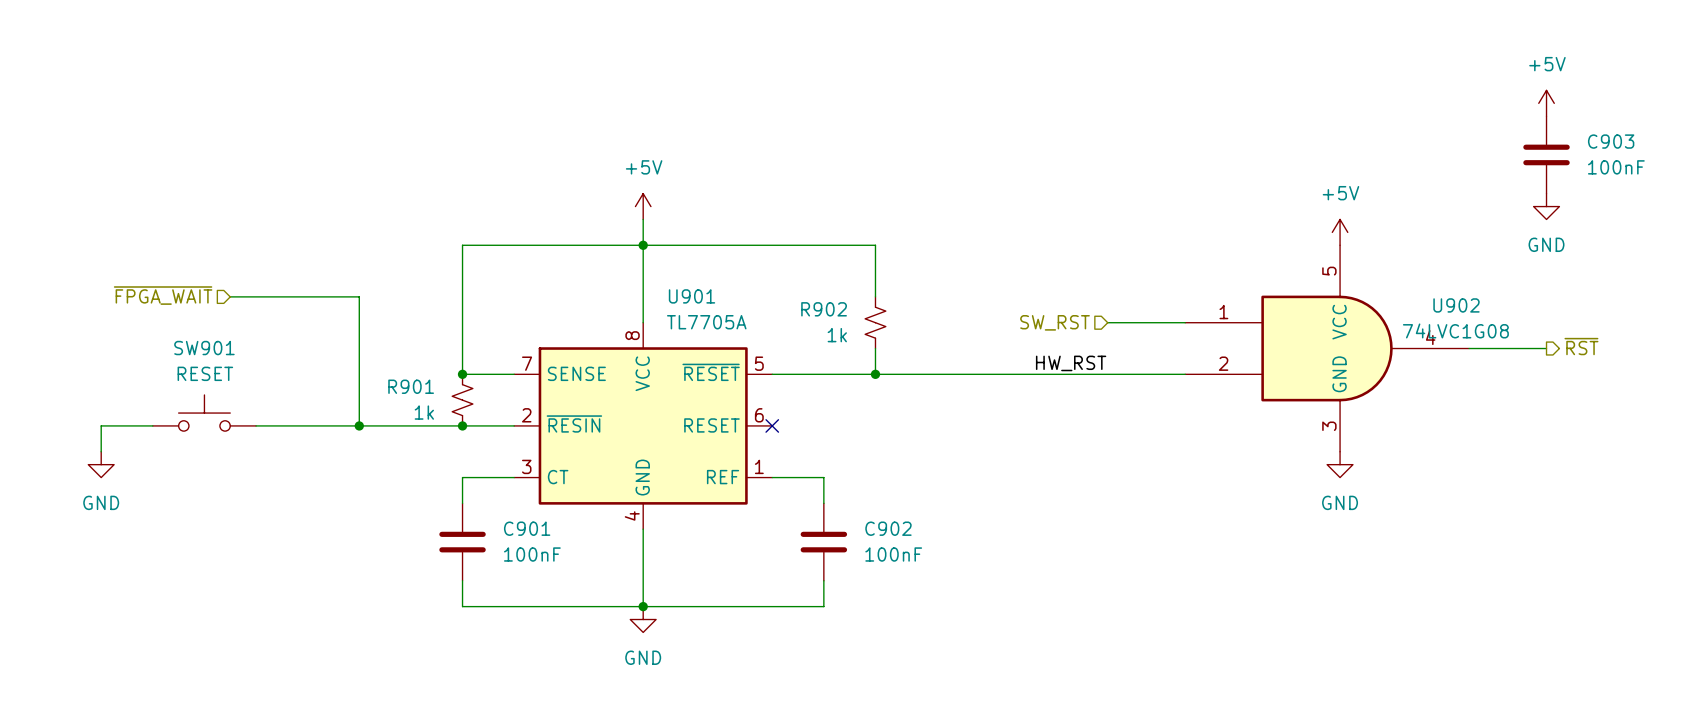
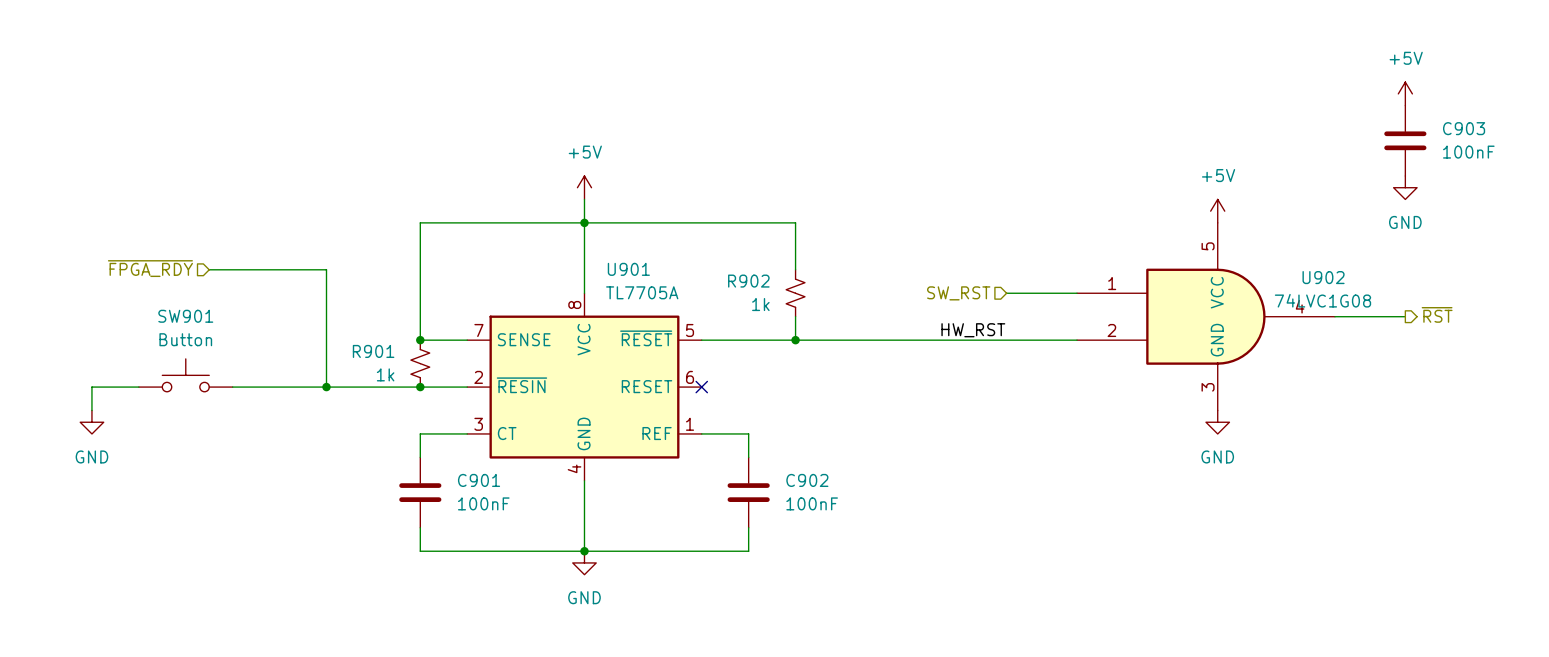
hierarchical label: ~{FPGA_WAIT} (163, 295) -> ~{FPGA_RDY} (150, 268)
SW901 value: RESET (205, 373) -> Button (185, 339)

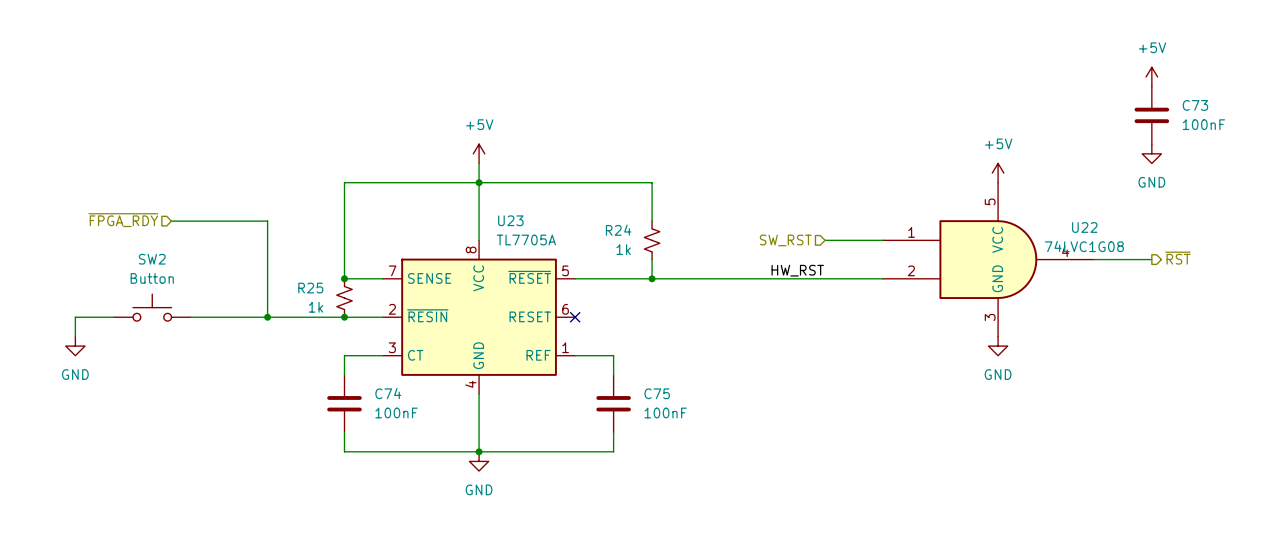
C903 name: C903 (1464, 128) -> C73 (1195, 105)
U901 name: U901 (628, 269) -> U23 (510, 220)
U902 name: U902 (1323, 277) -> U22 (1084, 227)
R902 name: R902 (748, 281) -> R24 (618, 230)
SW901 name: SW901 (185, 316) -> SW2 (152, 259)
R901 name: R901 (373, 351) -> R25 (310, 288)
C901 name: C901 (479, 480) -> C74 (388, 393)
C902 name: C902 (807, 480) -> C75 (657, 393)

